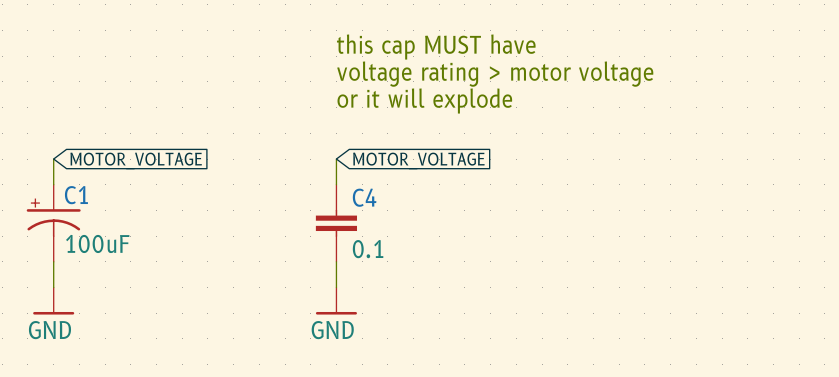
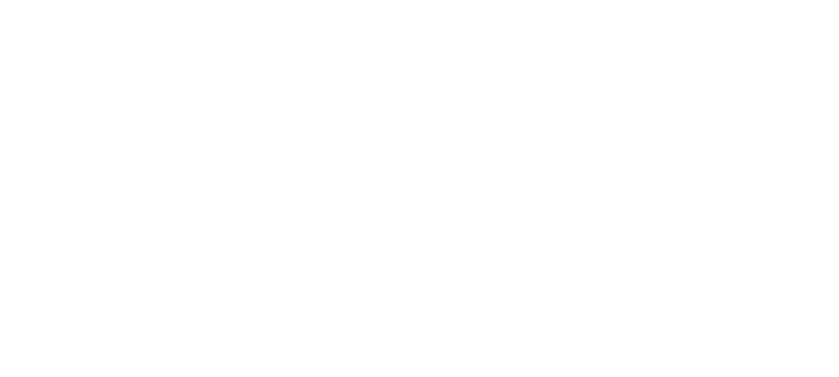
text: this cap MUST have (436, 47) -> none
text: voltage rating > motor voltage (495, 74) -> none
text: or it will explode (424, 101) -> none
wire: (53, 159) (53, 184) -> none
wire: (336, 159) (336, 184) -> none
global label: MOTOR_VOLTAGE (136, 160) -> none
global label: MOTOR_VOLTAGE (418, 160) -> none
C1: 100uF (53, 223) -> none
C4: 0.1 (336, 223) -> none
wire: (53, 261) (53, 287) -> none
wire: (336, 261) (336, 287) -> none
power symbol: GND (53, 301) -> none
power symbol: GND (336, 301) -> none

